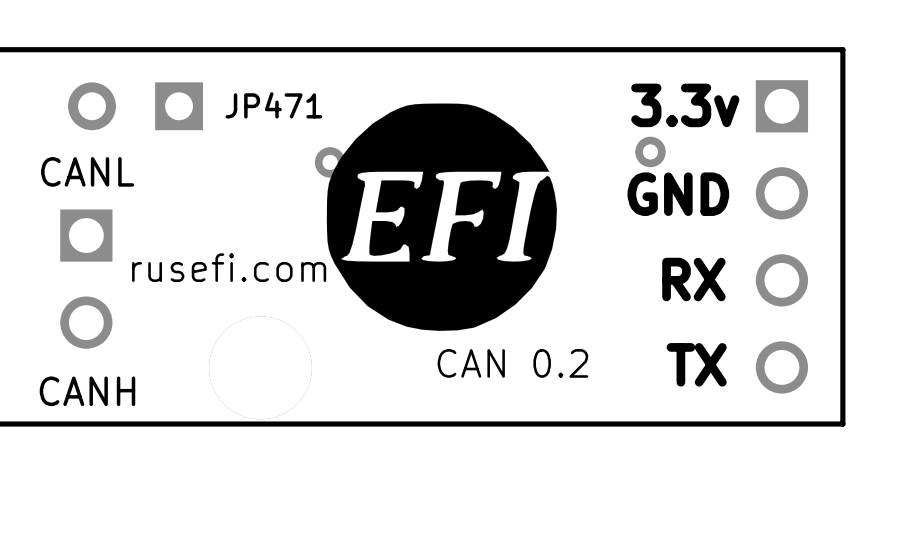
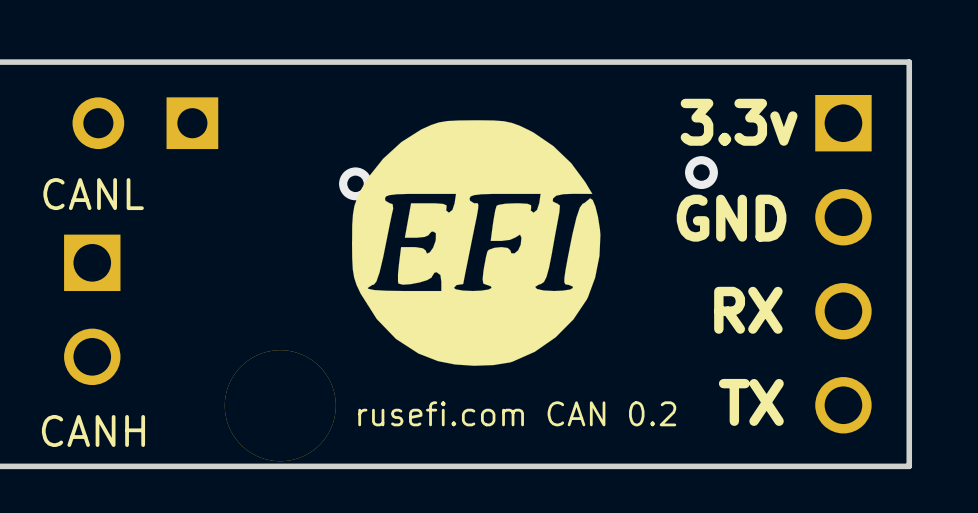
text: JP471 (273, 105) -> none
text: rusefi.com (229, 267) -> none
text: CAN 0.2 (512, 363) -> none
text: none -> rusefi.com CAN 0.2 (517, 413)

